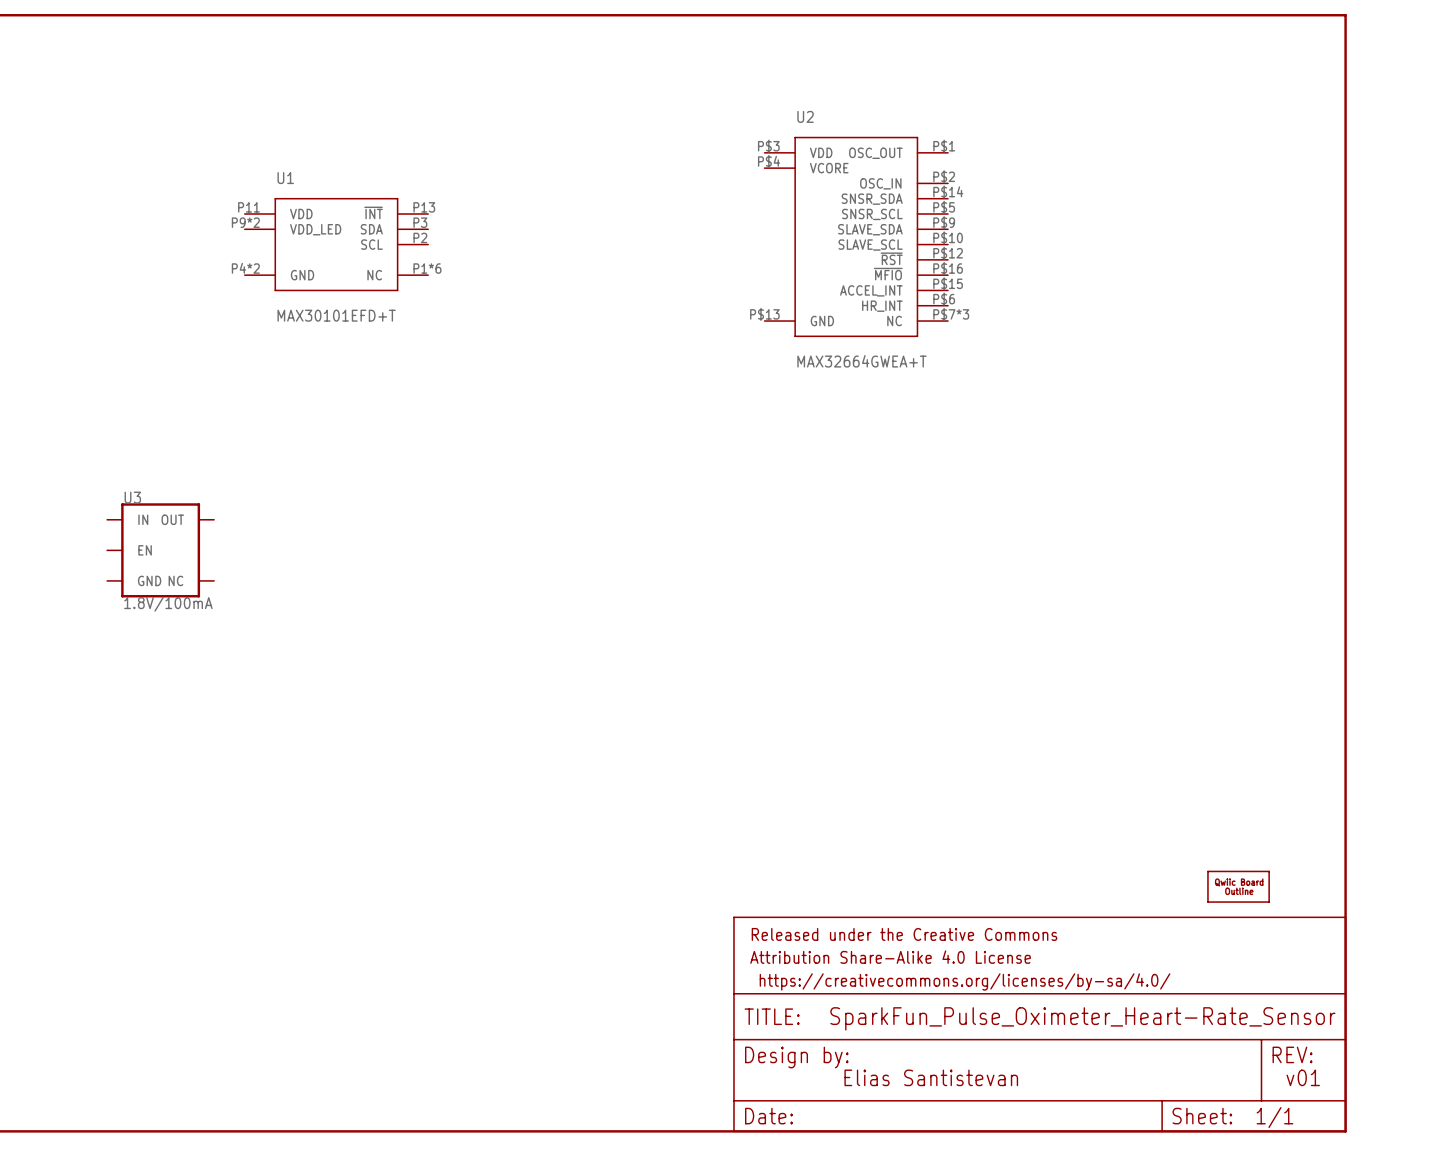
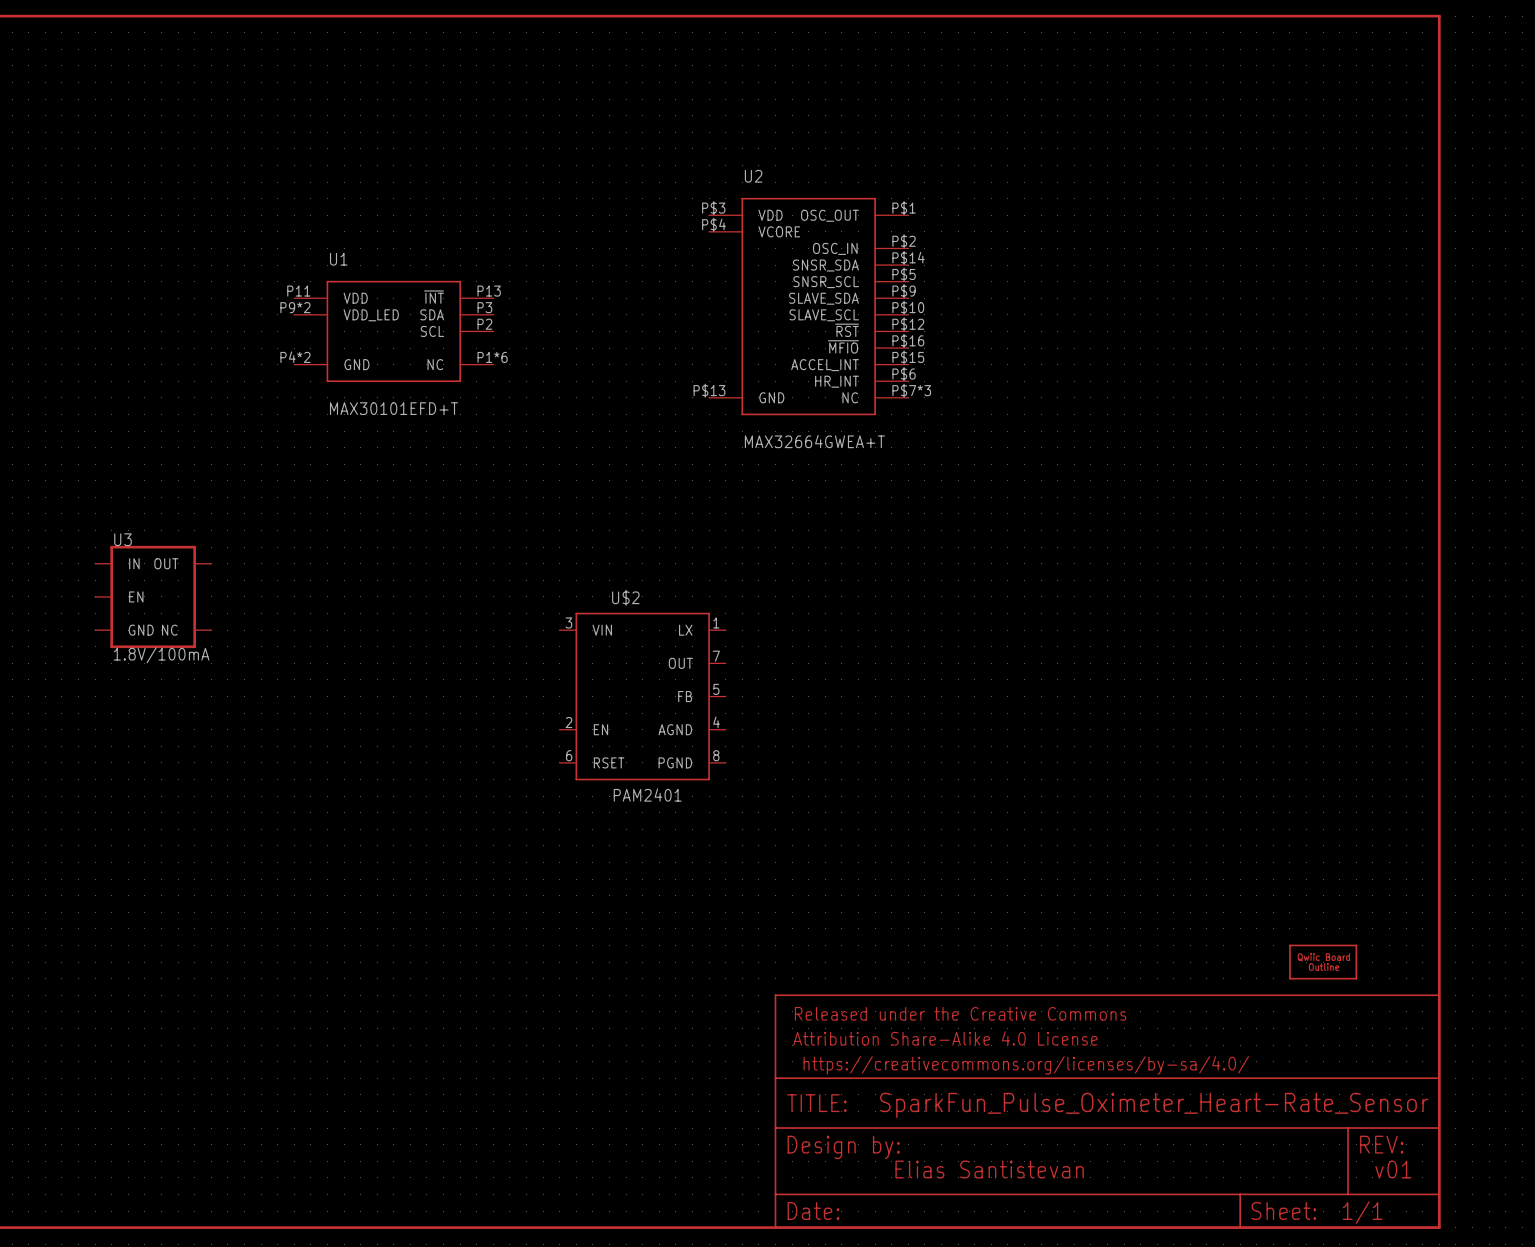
U2 position: (856, 236) -> (808, 306)
U1 position: (336, 244) -> (393, 331)
U$2: none -> PAM2401 (642, 696)

